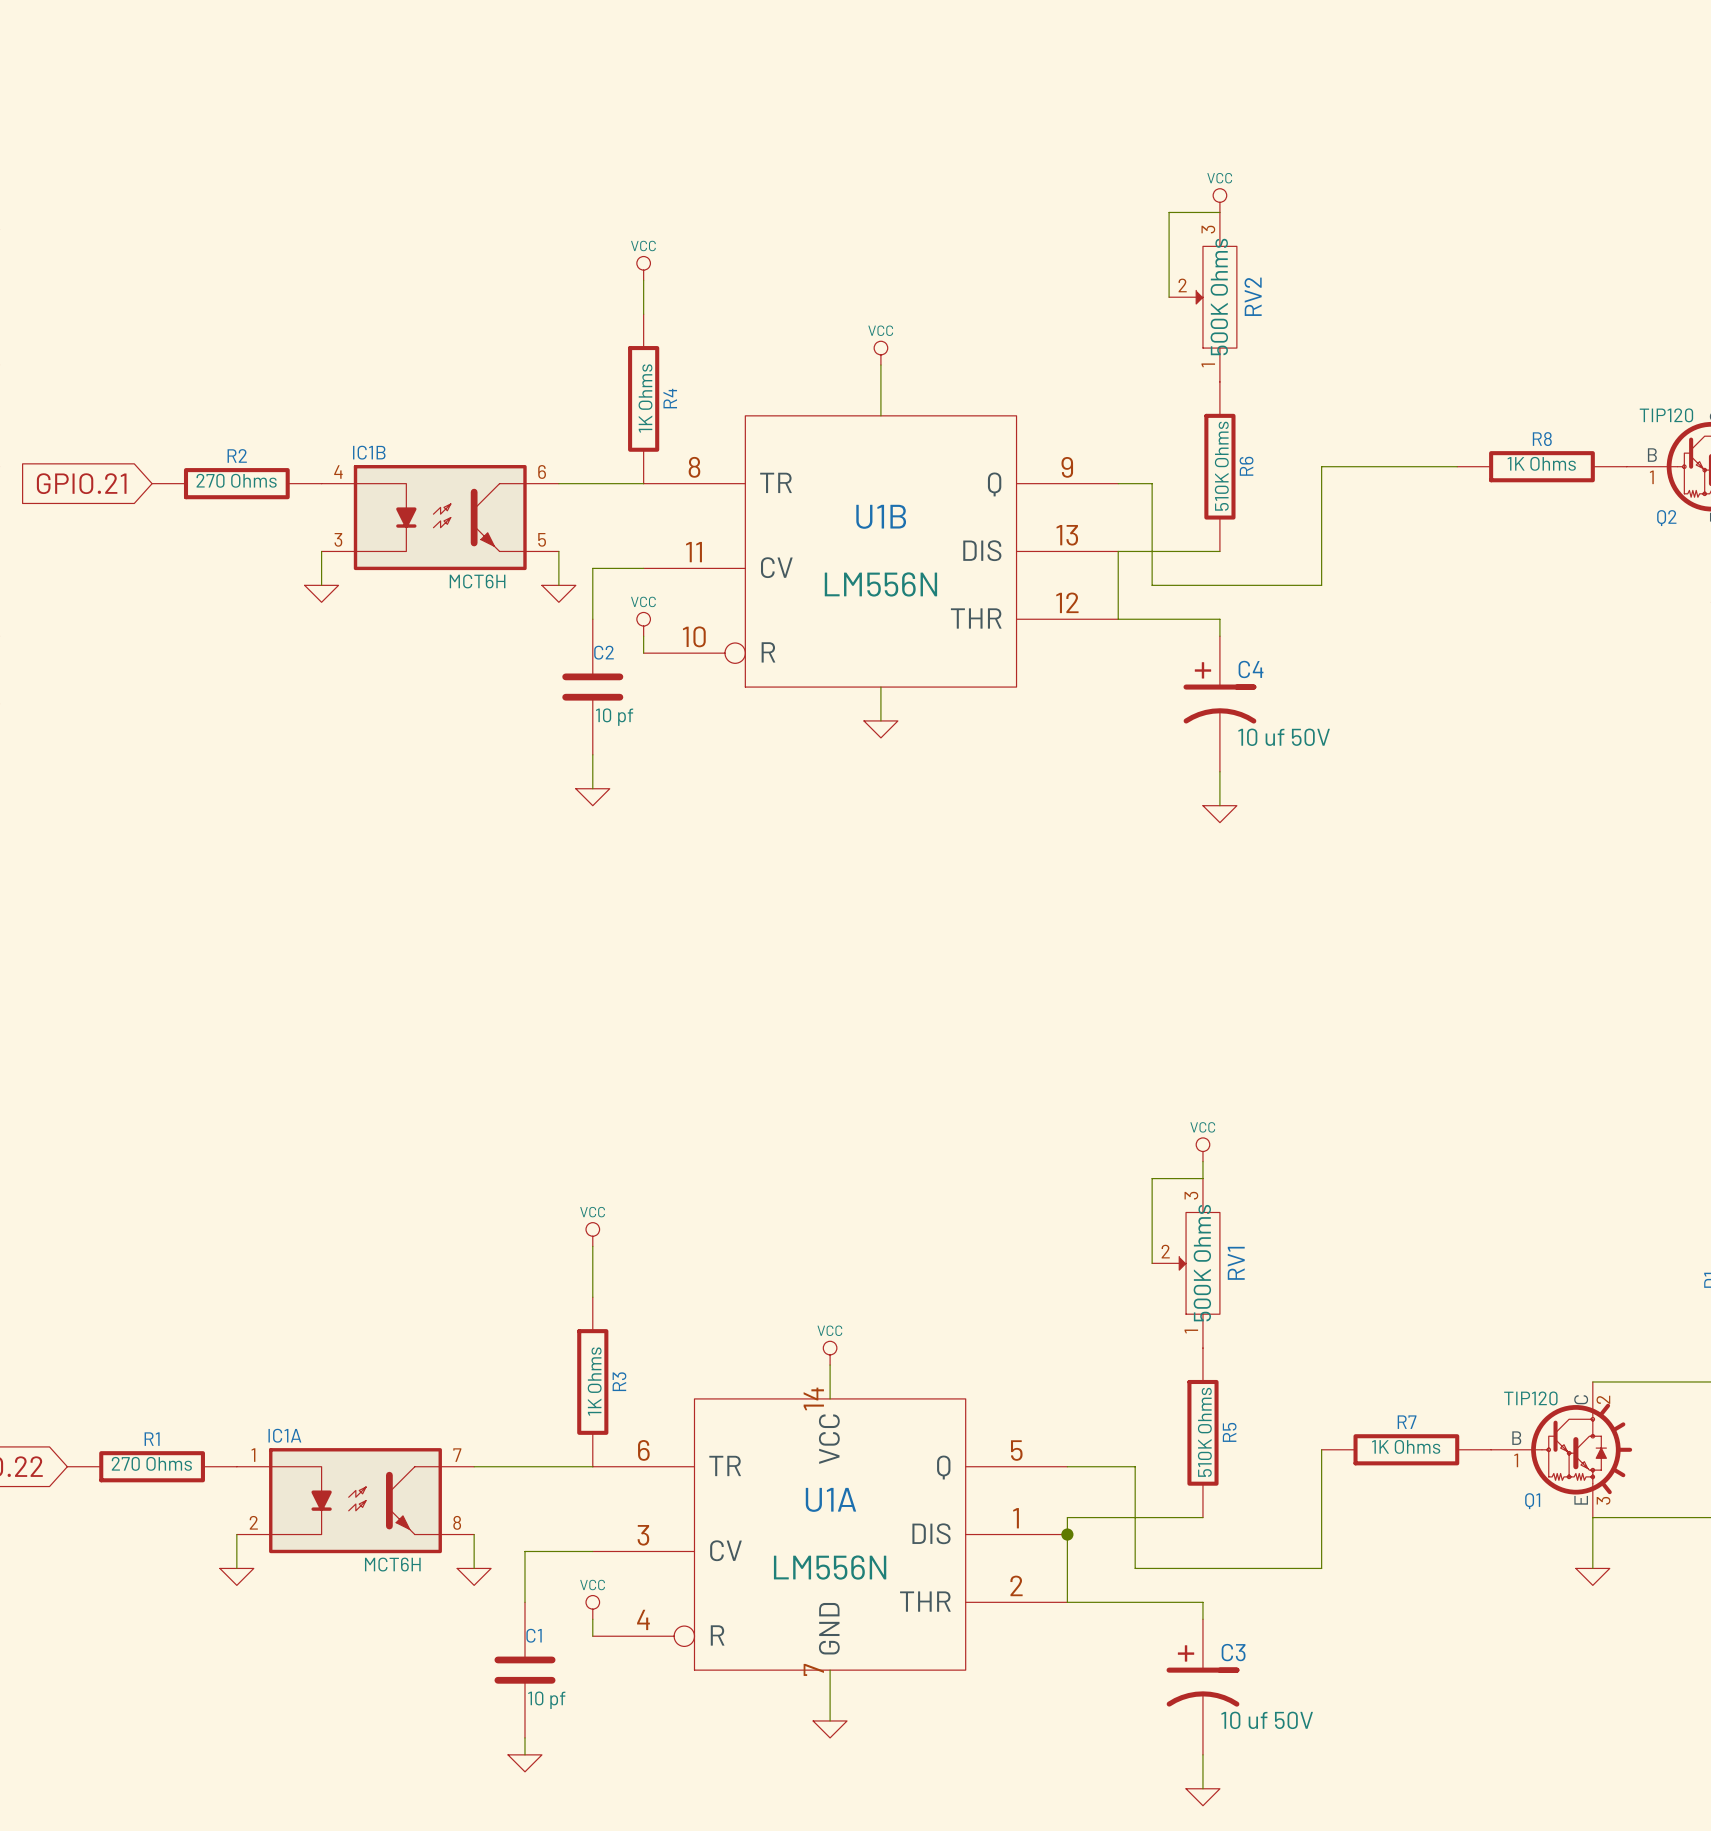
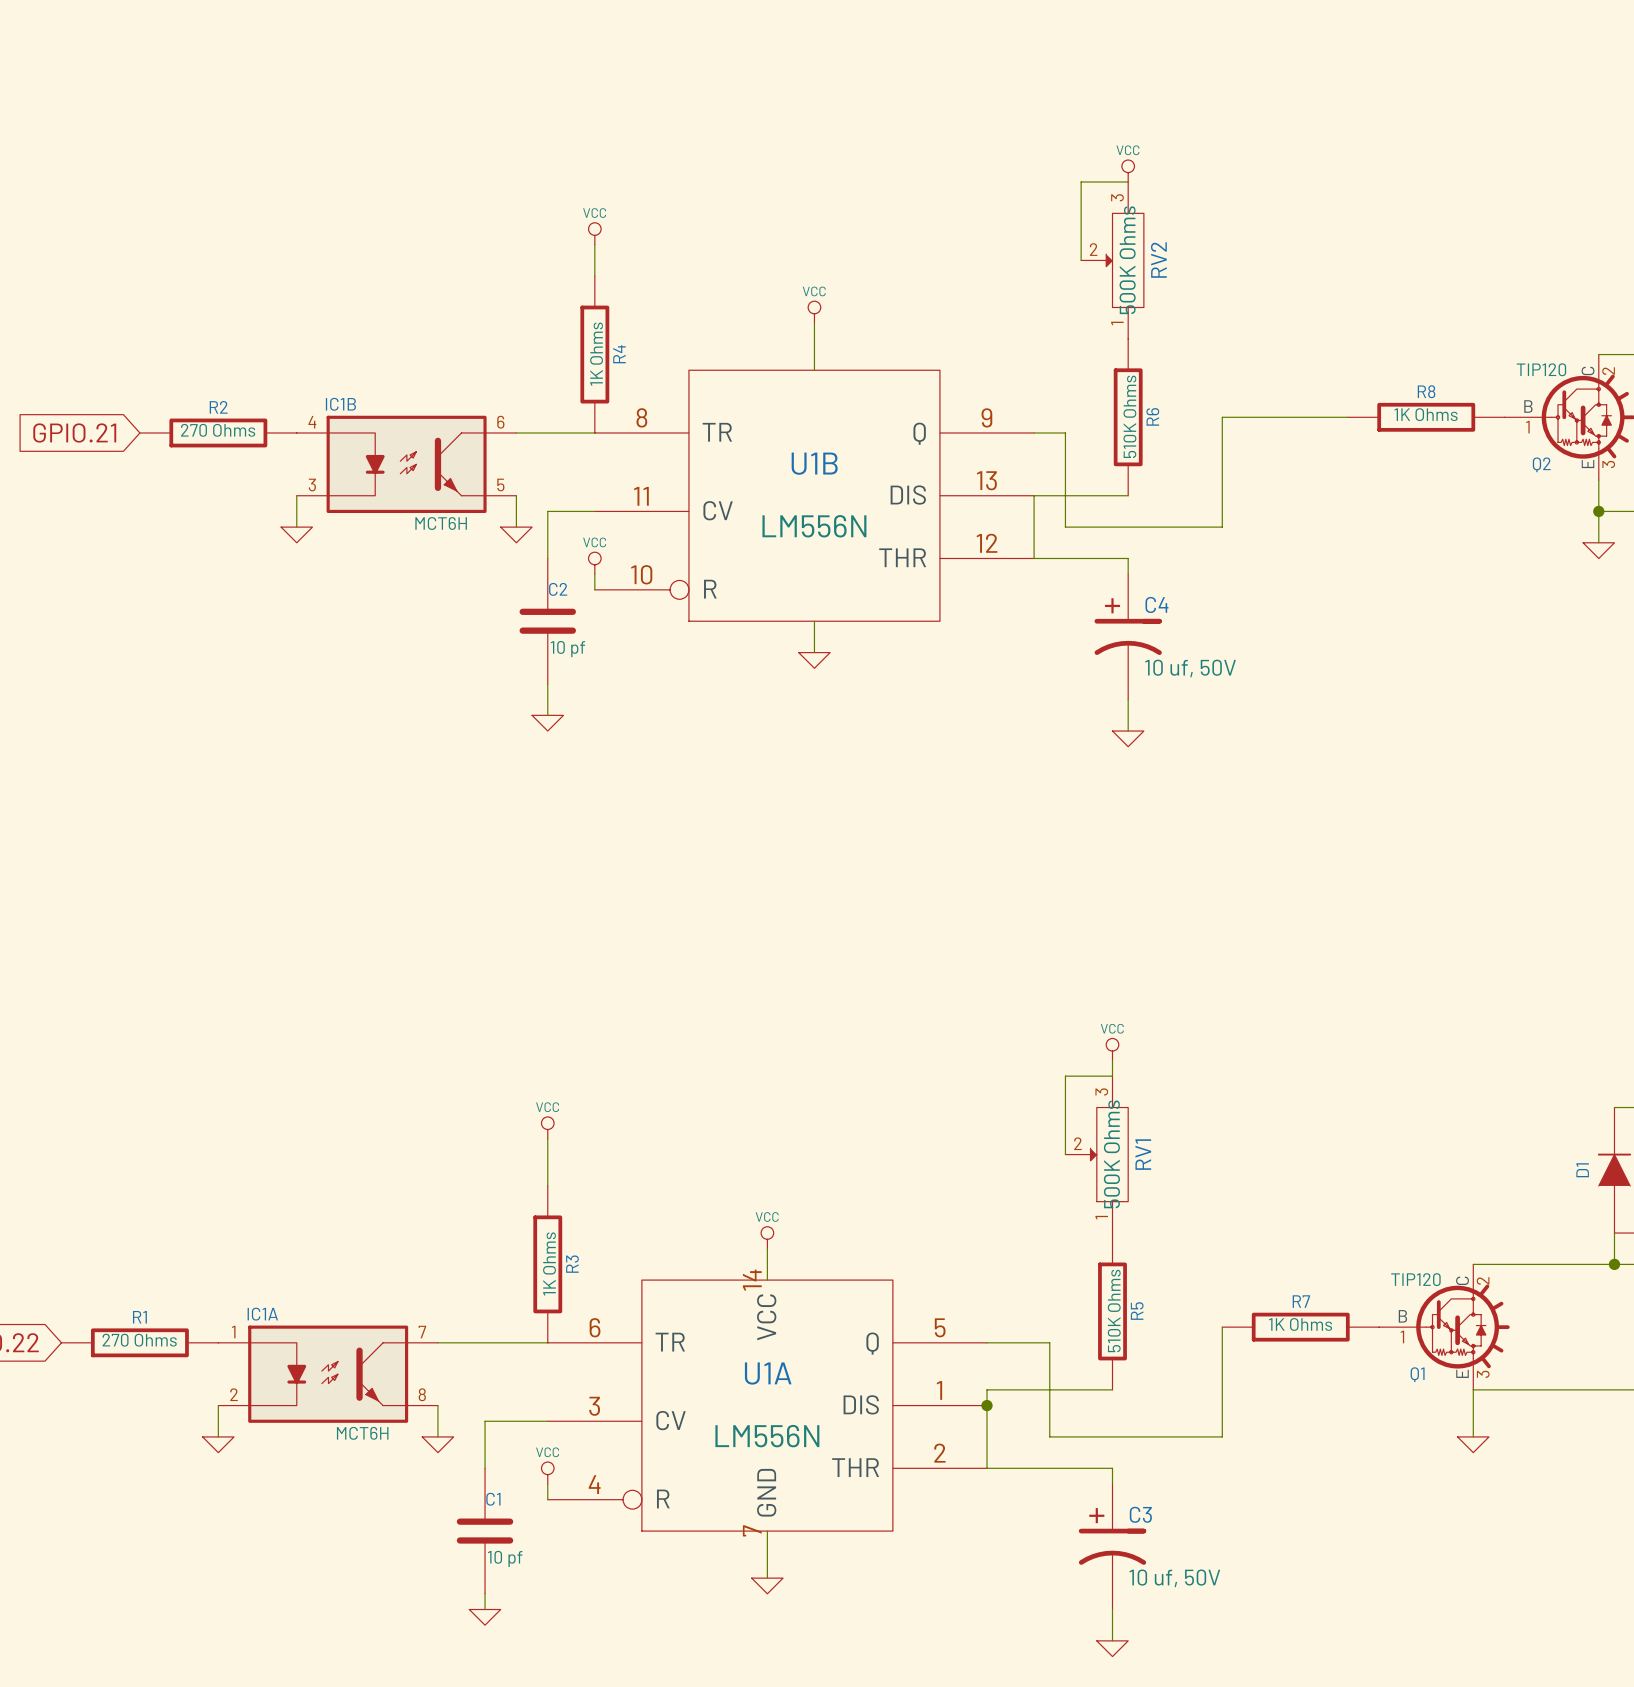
C4 value: 10 uf 50V (1284, 737) -> 10 uf, 50V (1190, 668)
C3 value: 10 uf 50V (1267, 1720) -> 10 uf, 50V (1174, 1578)

